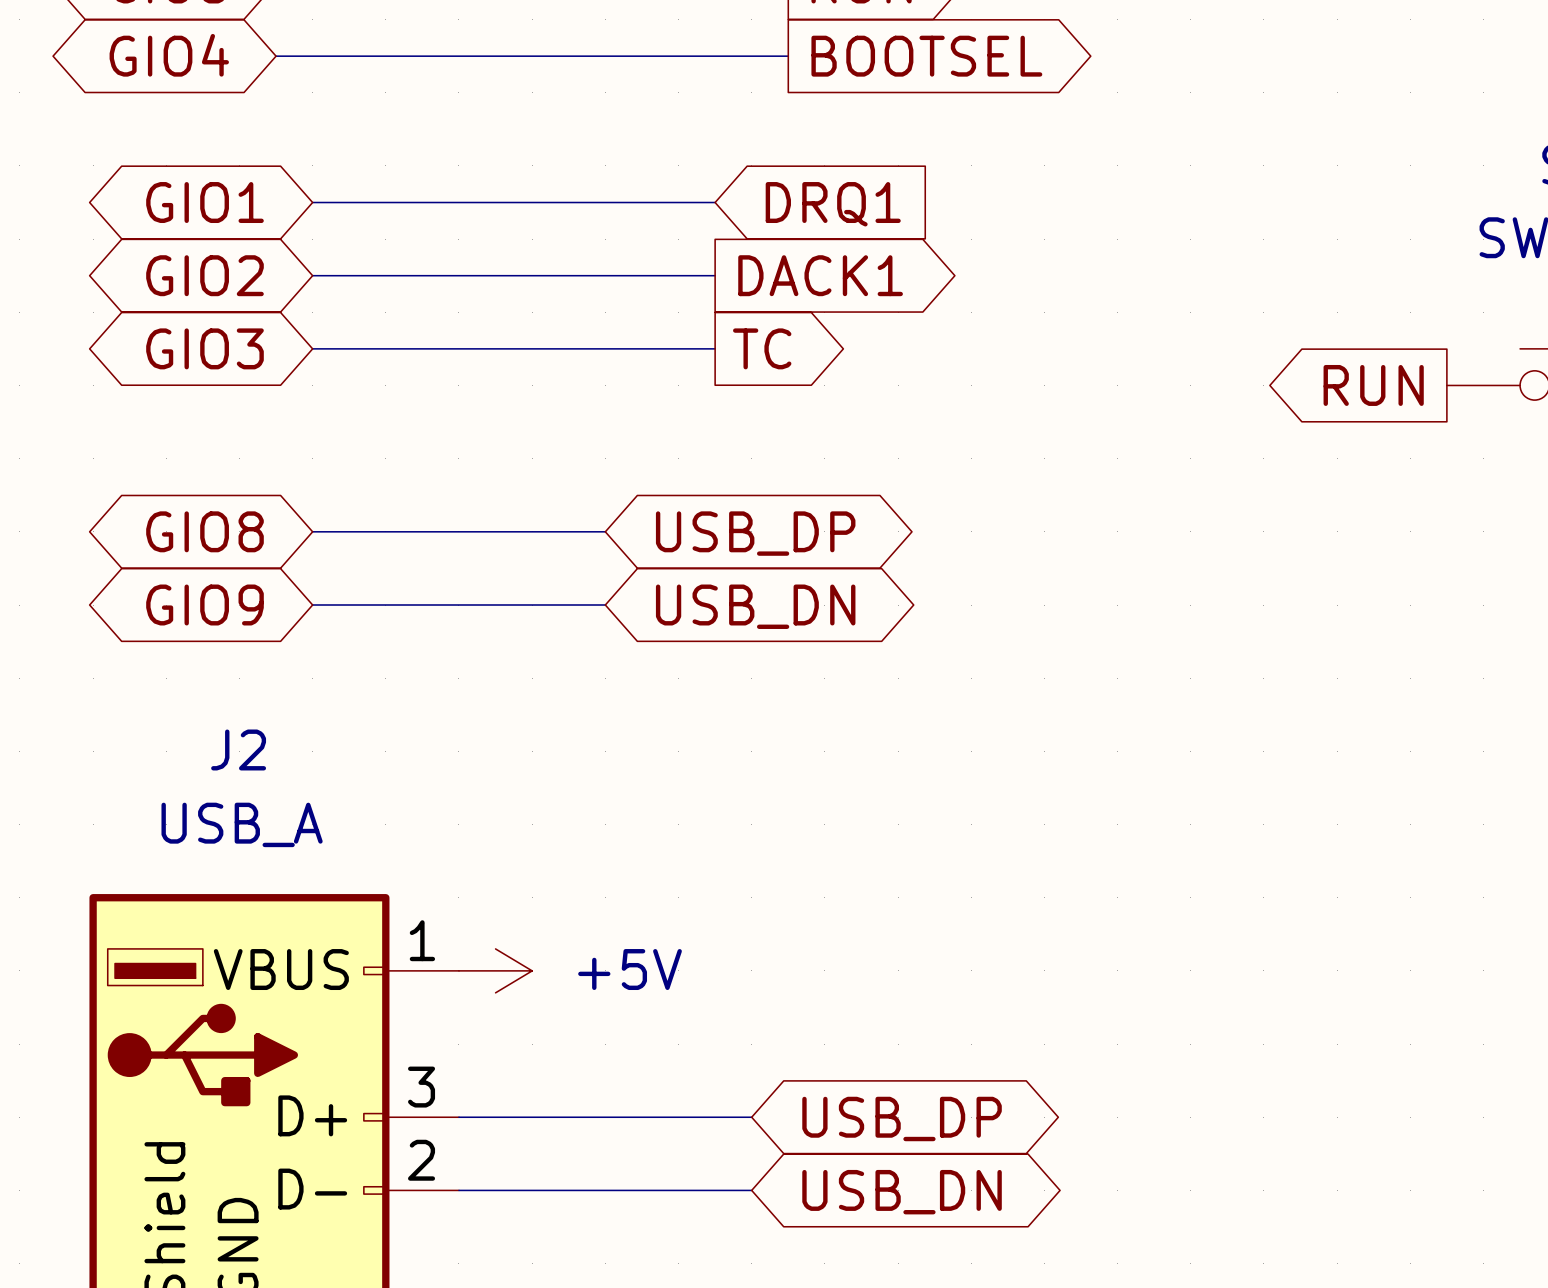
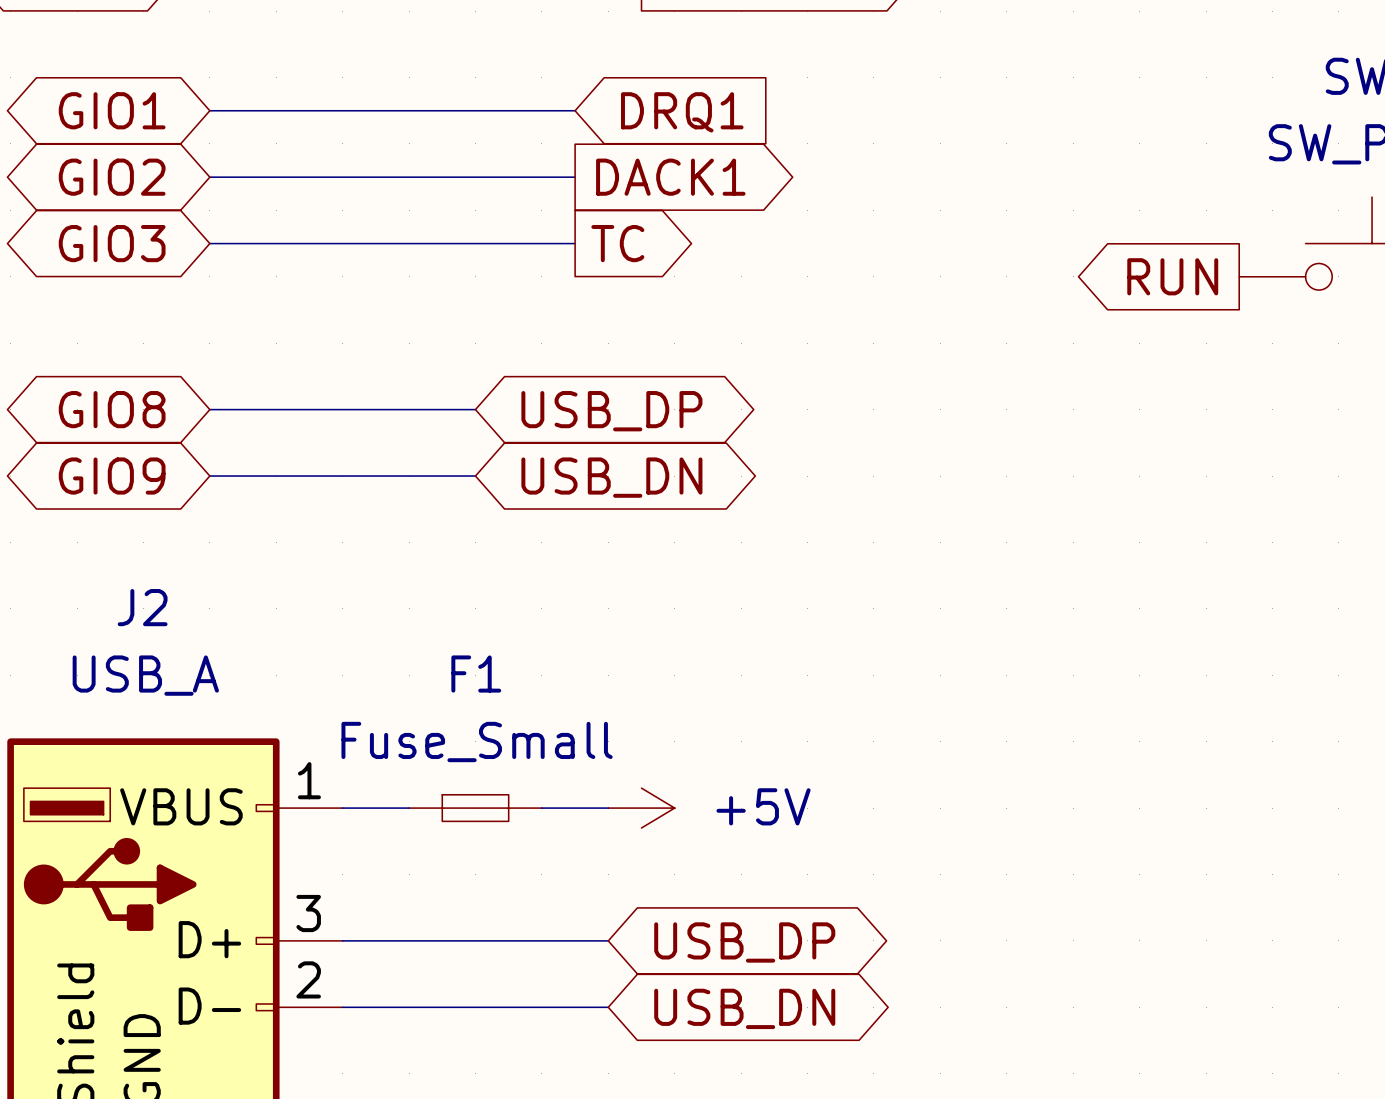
power symbol position: +5V (495, 970) -> +5V (641, 808)
F1: none -> Fuse_Small (475, 808)
wire: none -> (541, 808) (608, 808)

